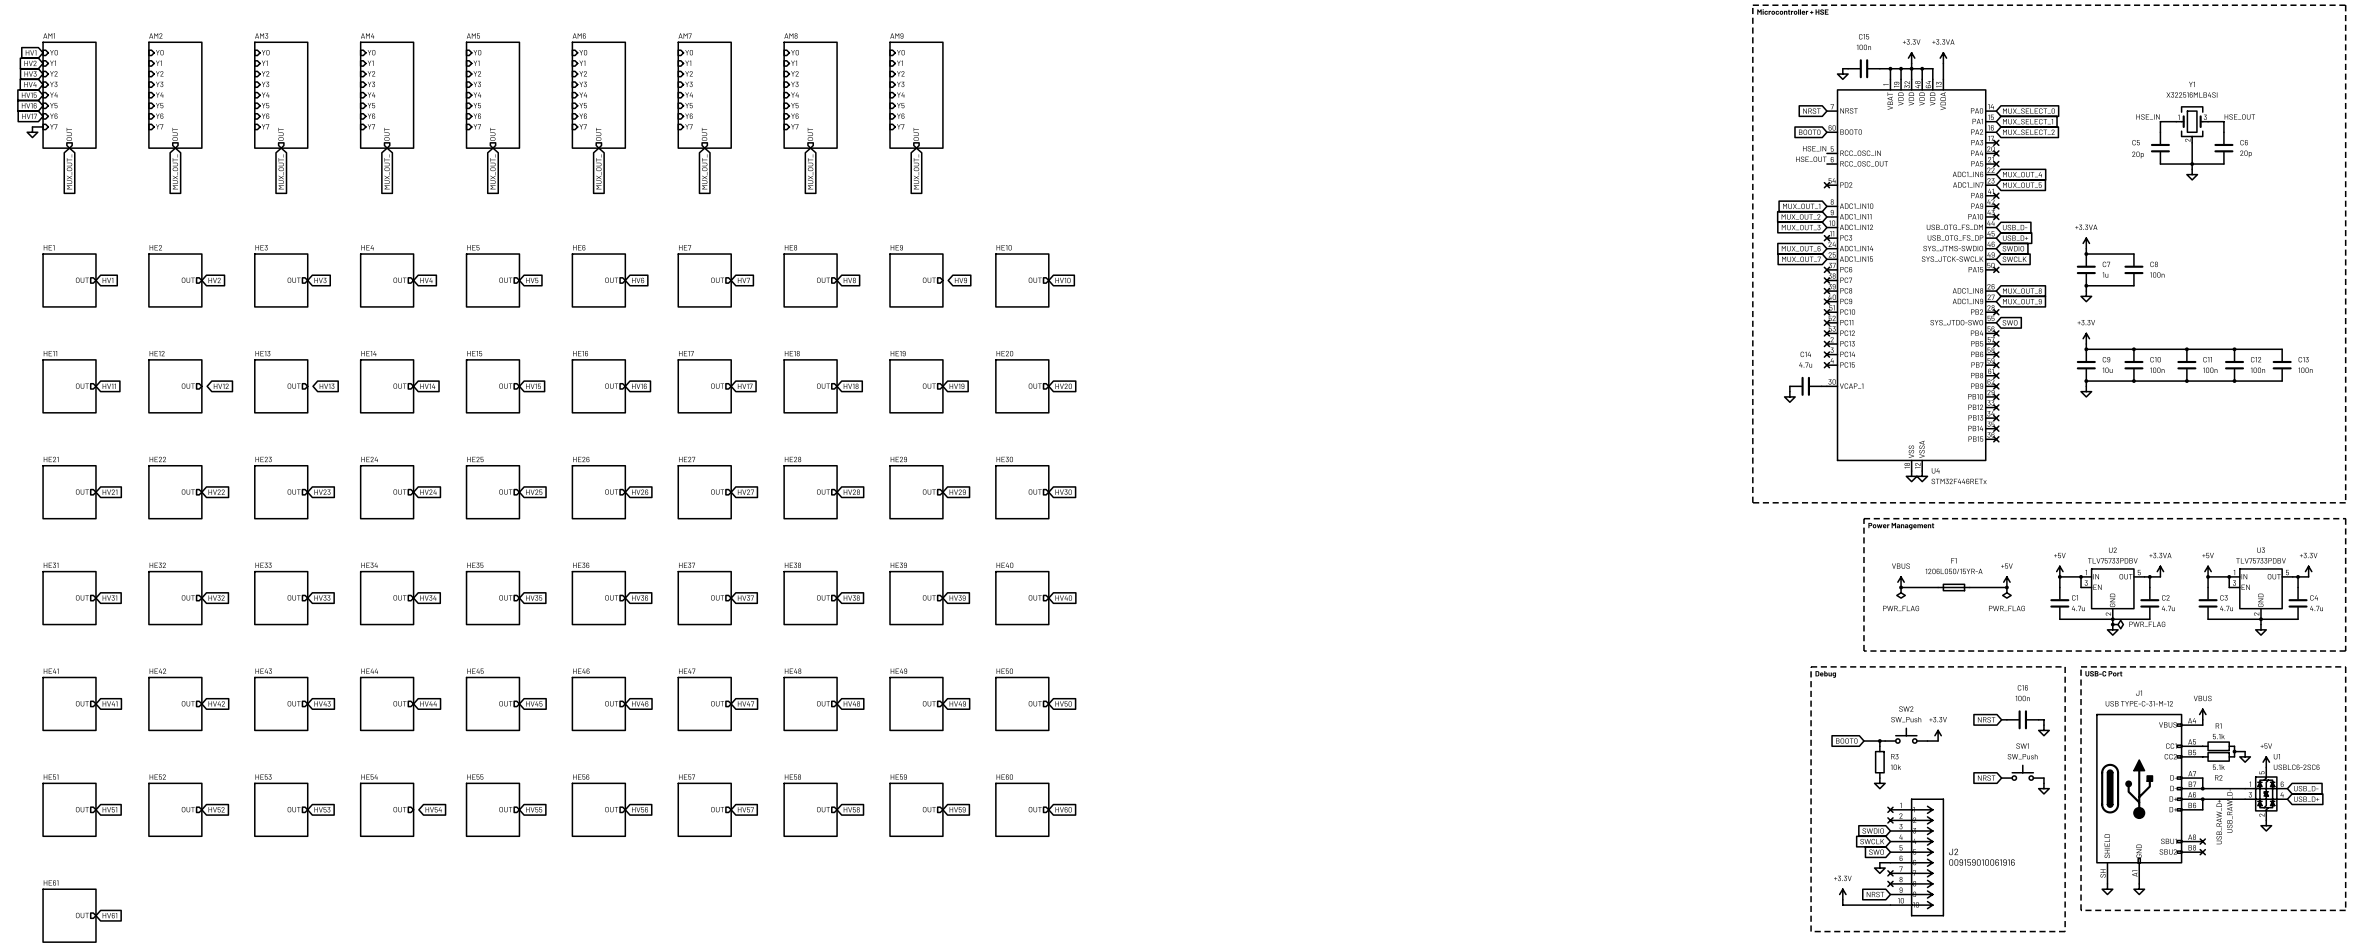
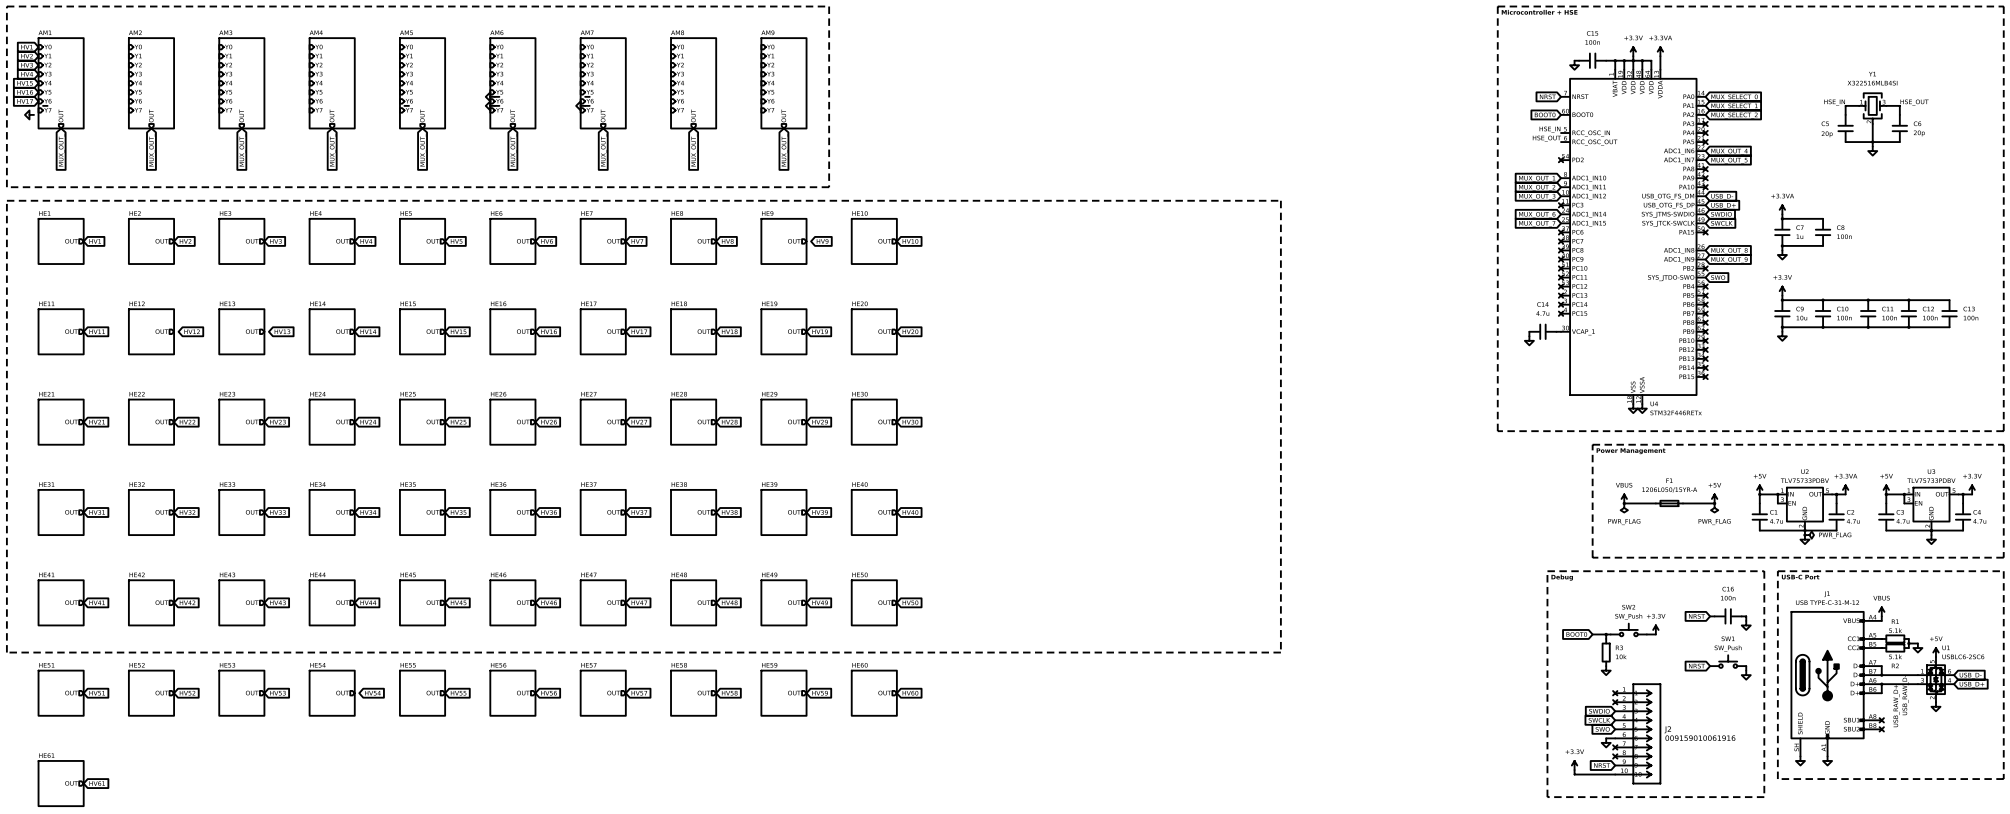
line: none -> (6, 6) (6, 187) (829, 187) (829, 6) (6, 6)
power symbol: none -> (490, 96)
wire: none -> (494, 96) (499, 96)
wire: none -> (585, 96) (589, 96)
wire: none -> (43, 105) (47, 105)
wire: none -> (404, 105) (408, 105)
power symbol: none -> (490, 105)
wire: none -> (494, 105) (499, 105)
power symbol: none -> (580, 105)
wire: none -> (585, 105) (589, 105)
wire: (32, 126) (43, 126) -> none
power symbol rotation: 0° (32, 132) -> 90° clockwise (29, 114)
line: none -> (6, 200) (1280, 200) (1280, 652) (6, 652) (6, 200)

